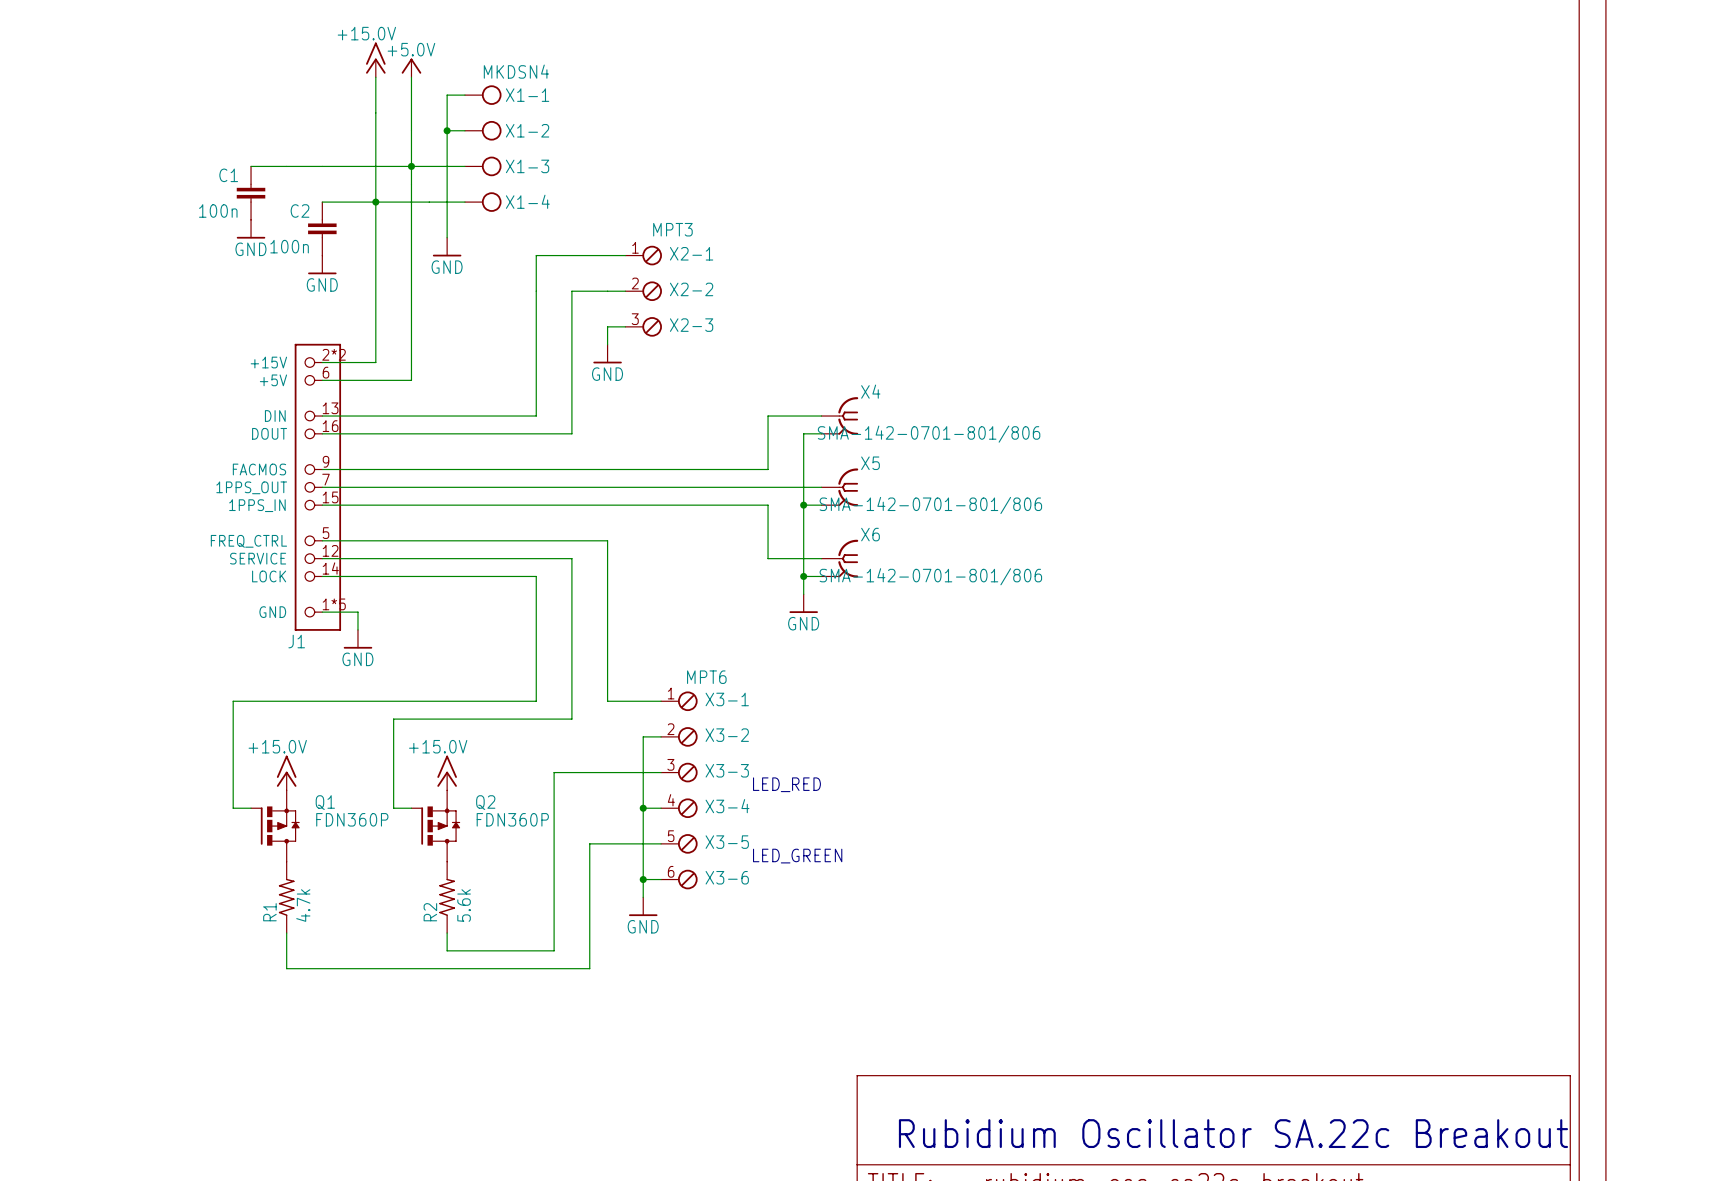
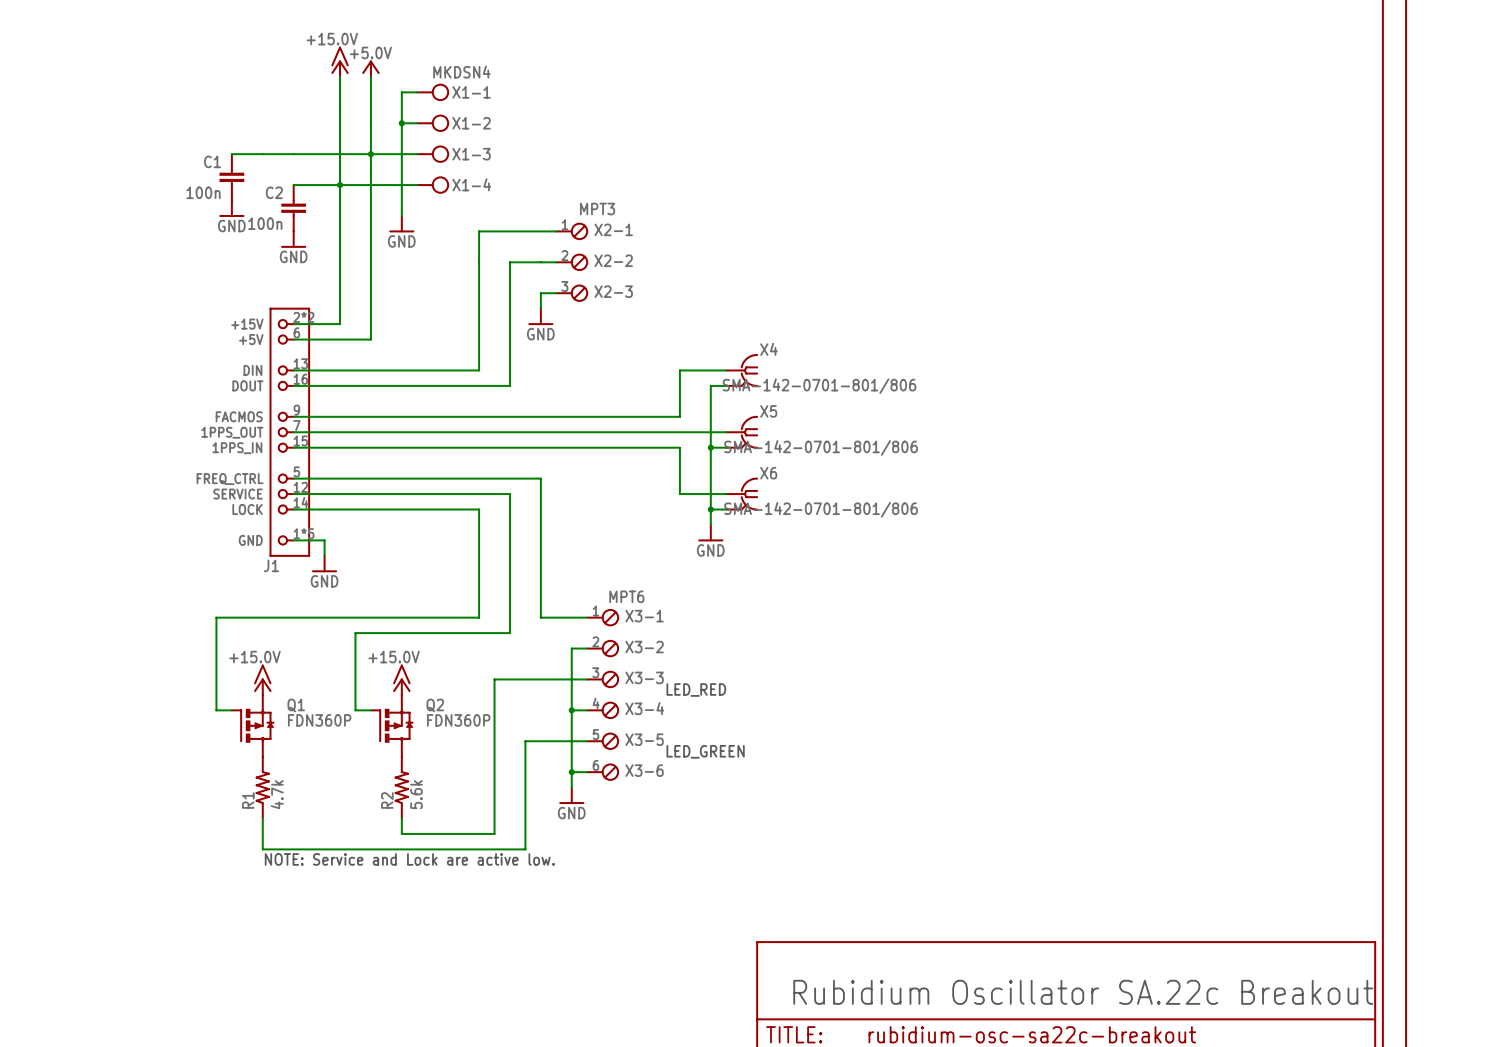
text: none -> NOTE: Service and Lock are active low. (409, 859)

